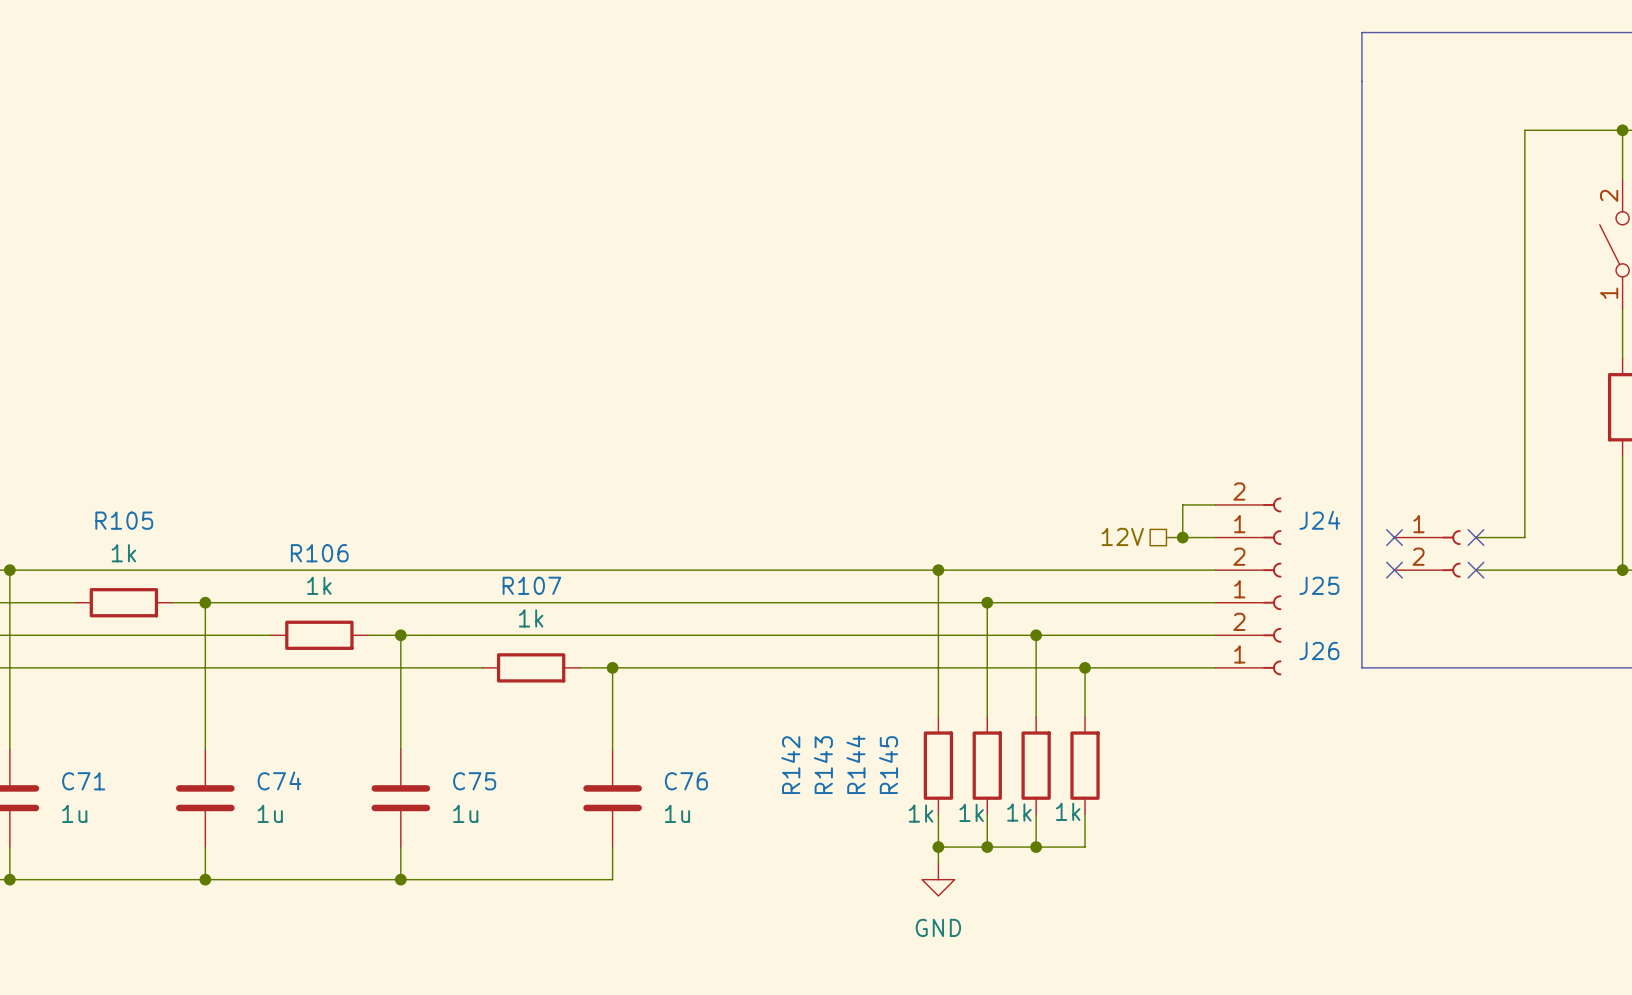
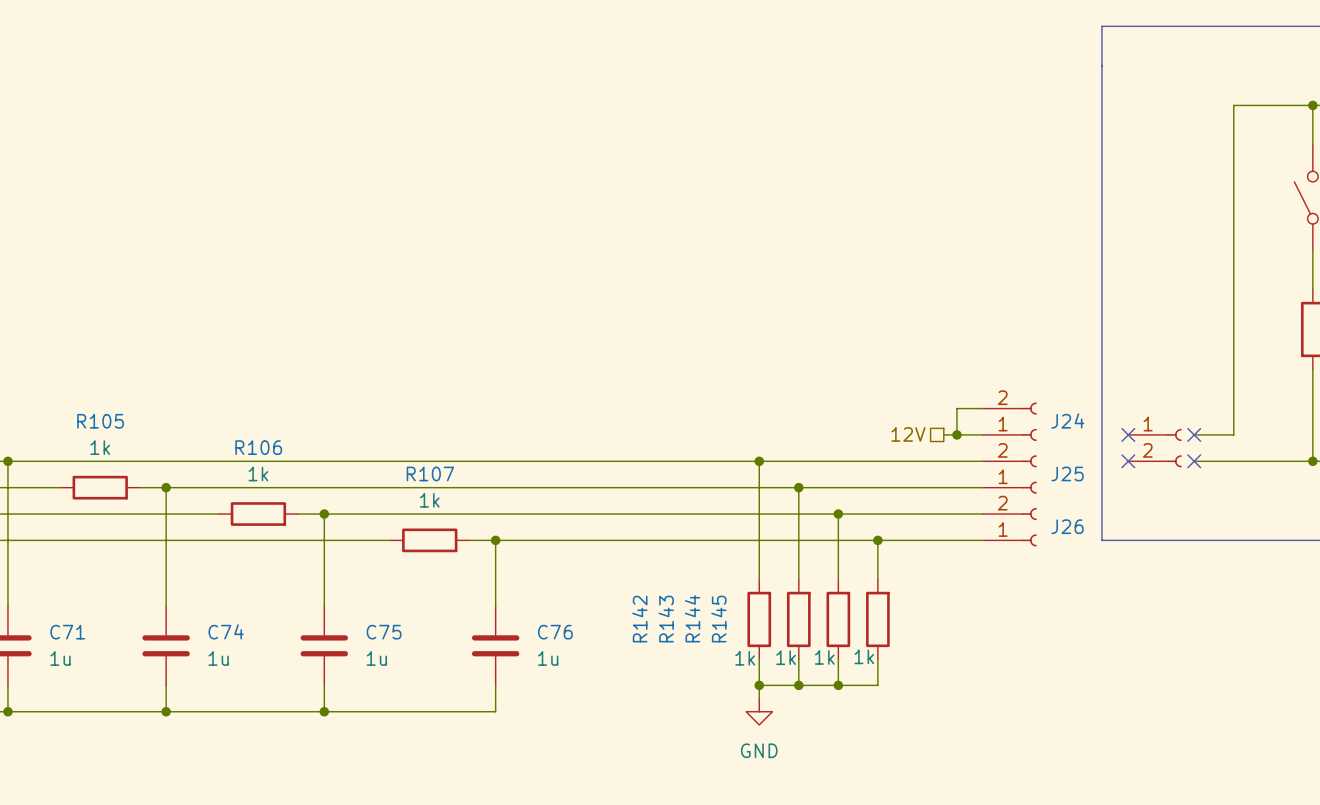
part pin number: 2 (1609, 195) -> none
part pin number: 1 (1609, 293) -> none

